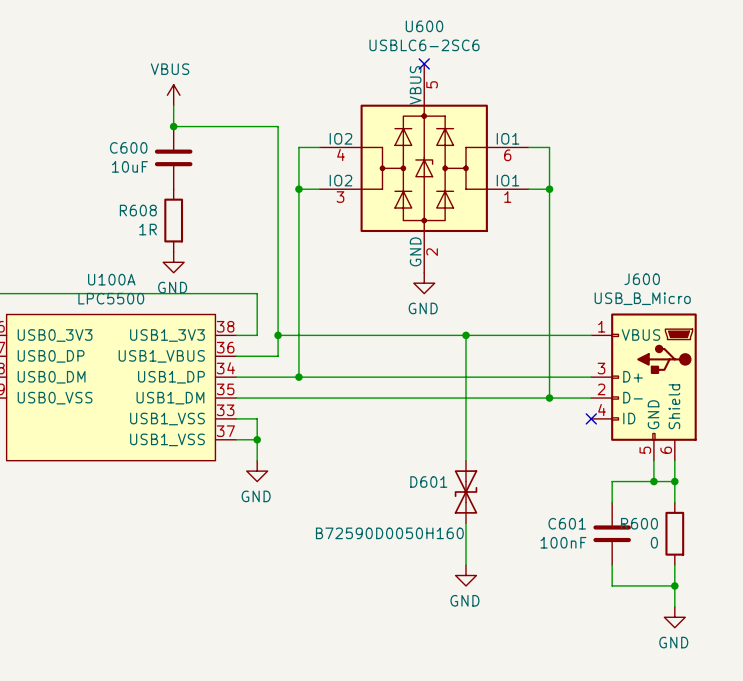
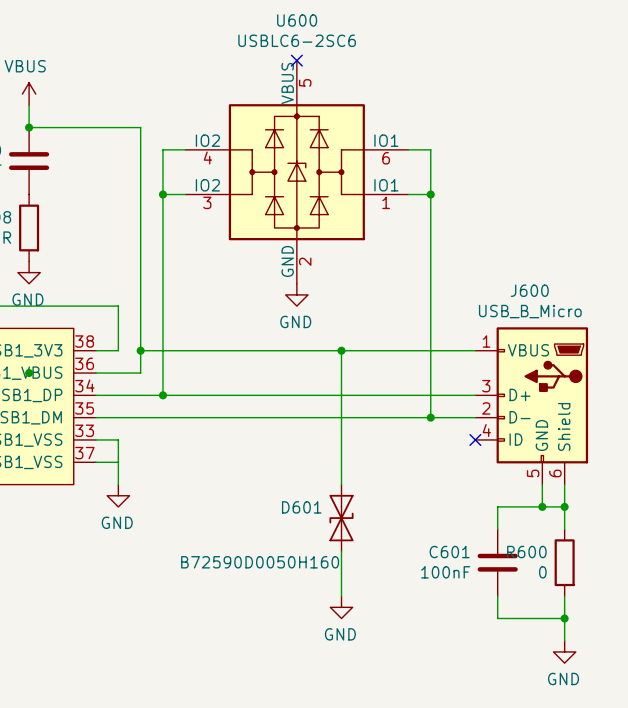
junction: none -> (29, 373)
junction: (257, 439) -> none

